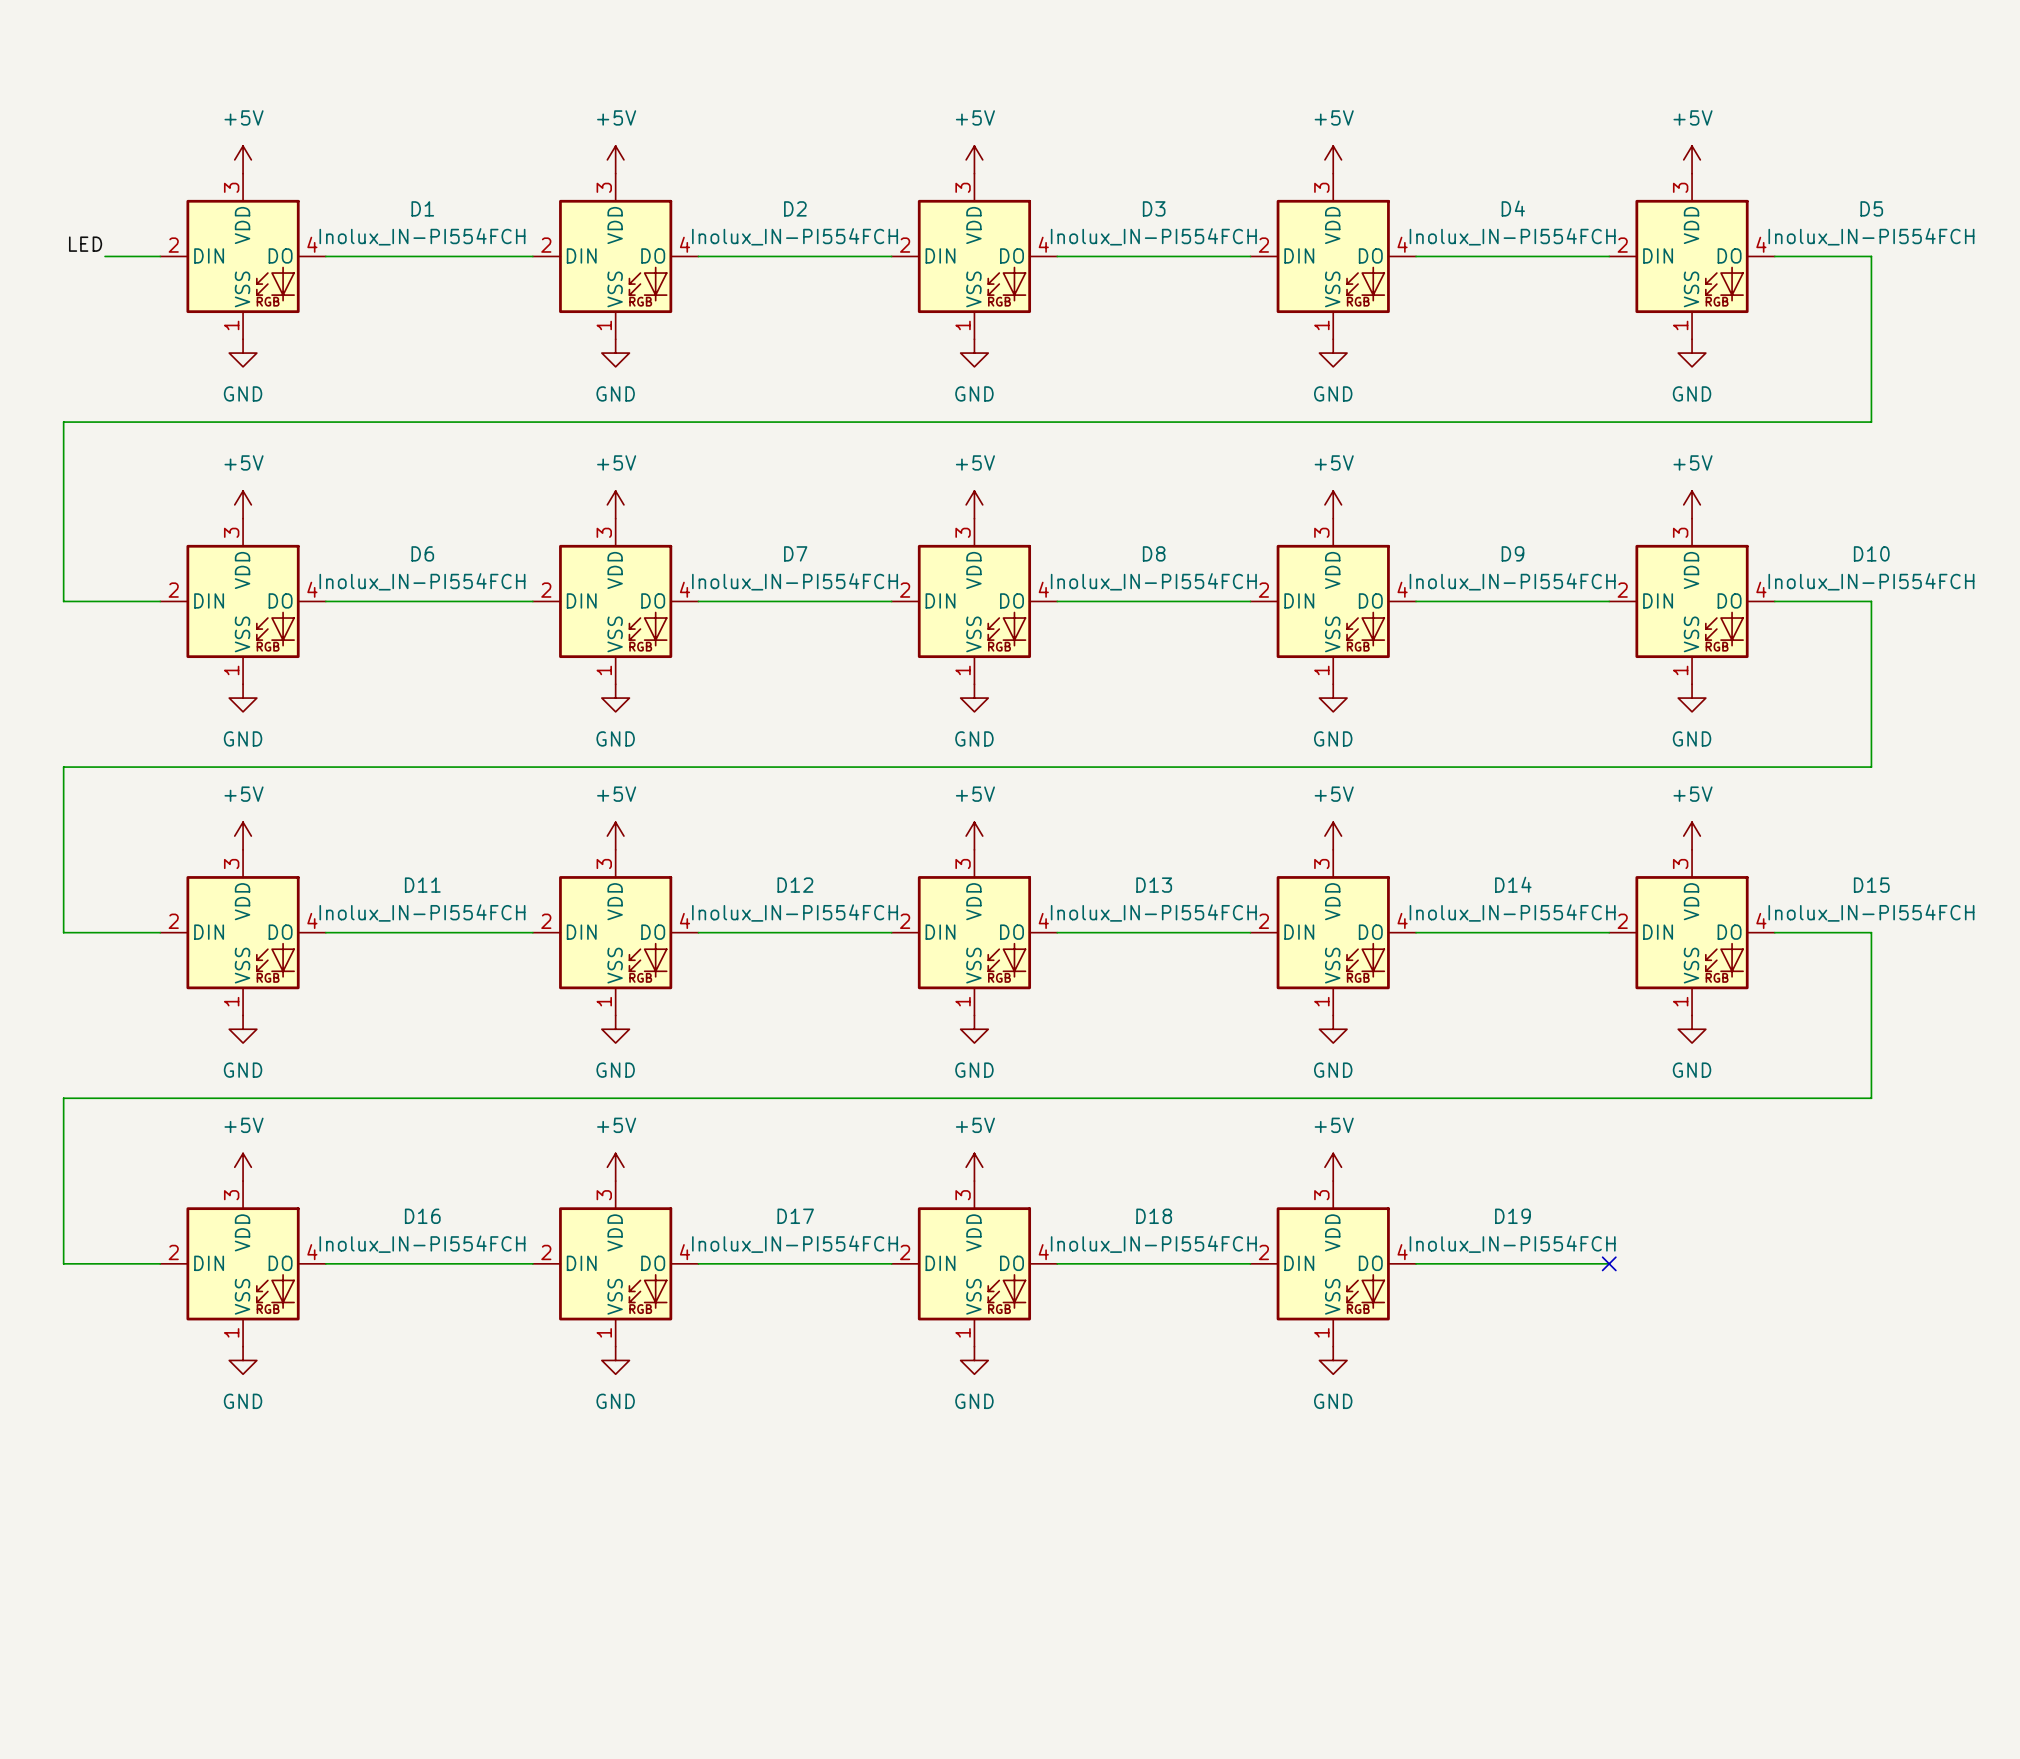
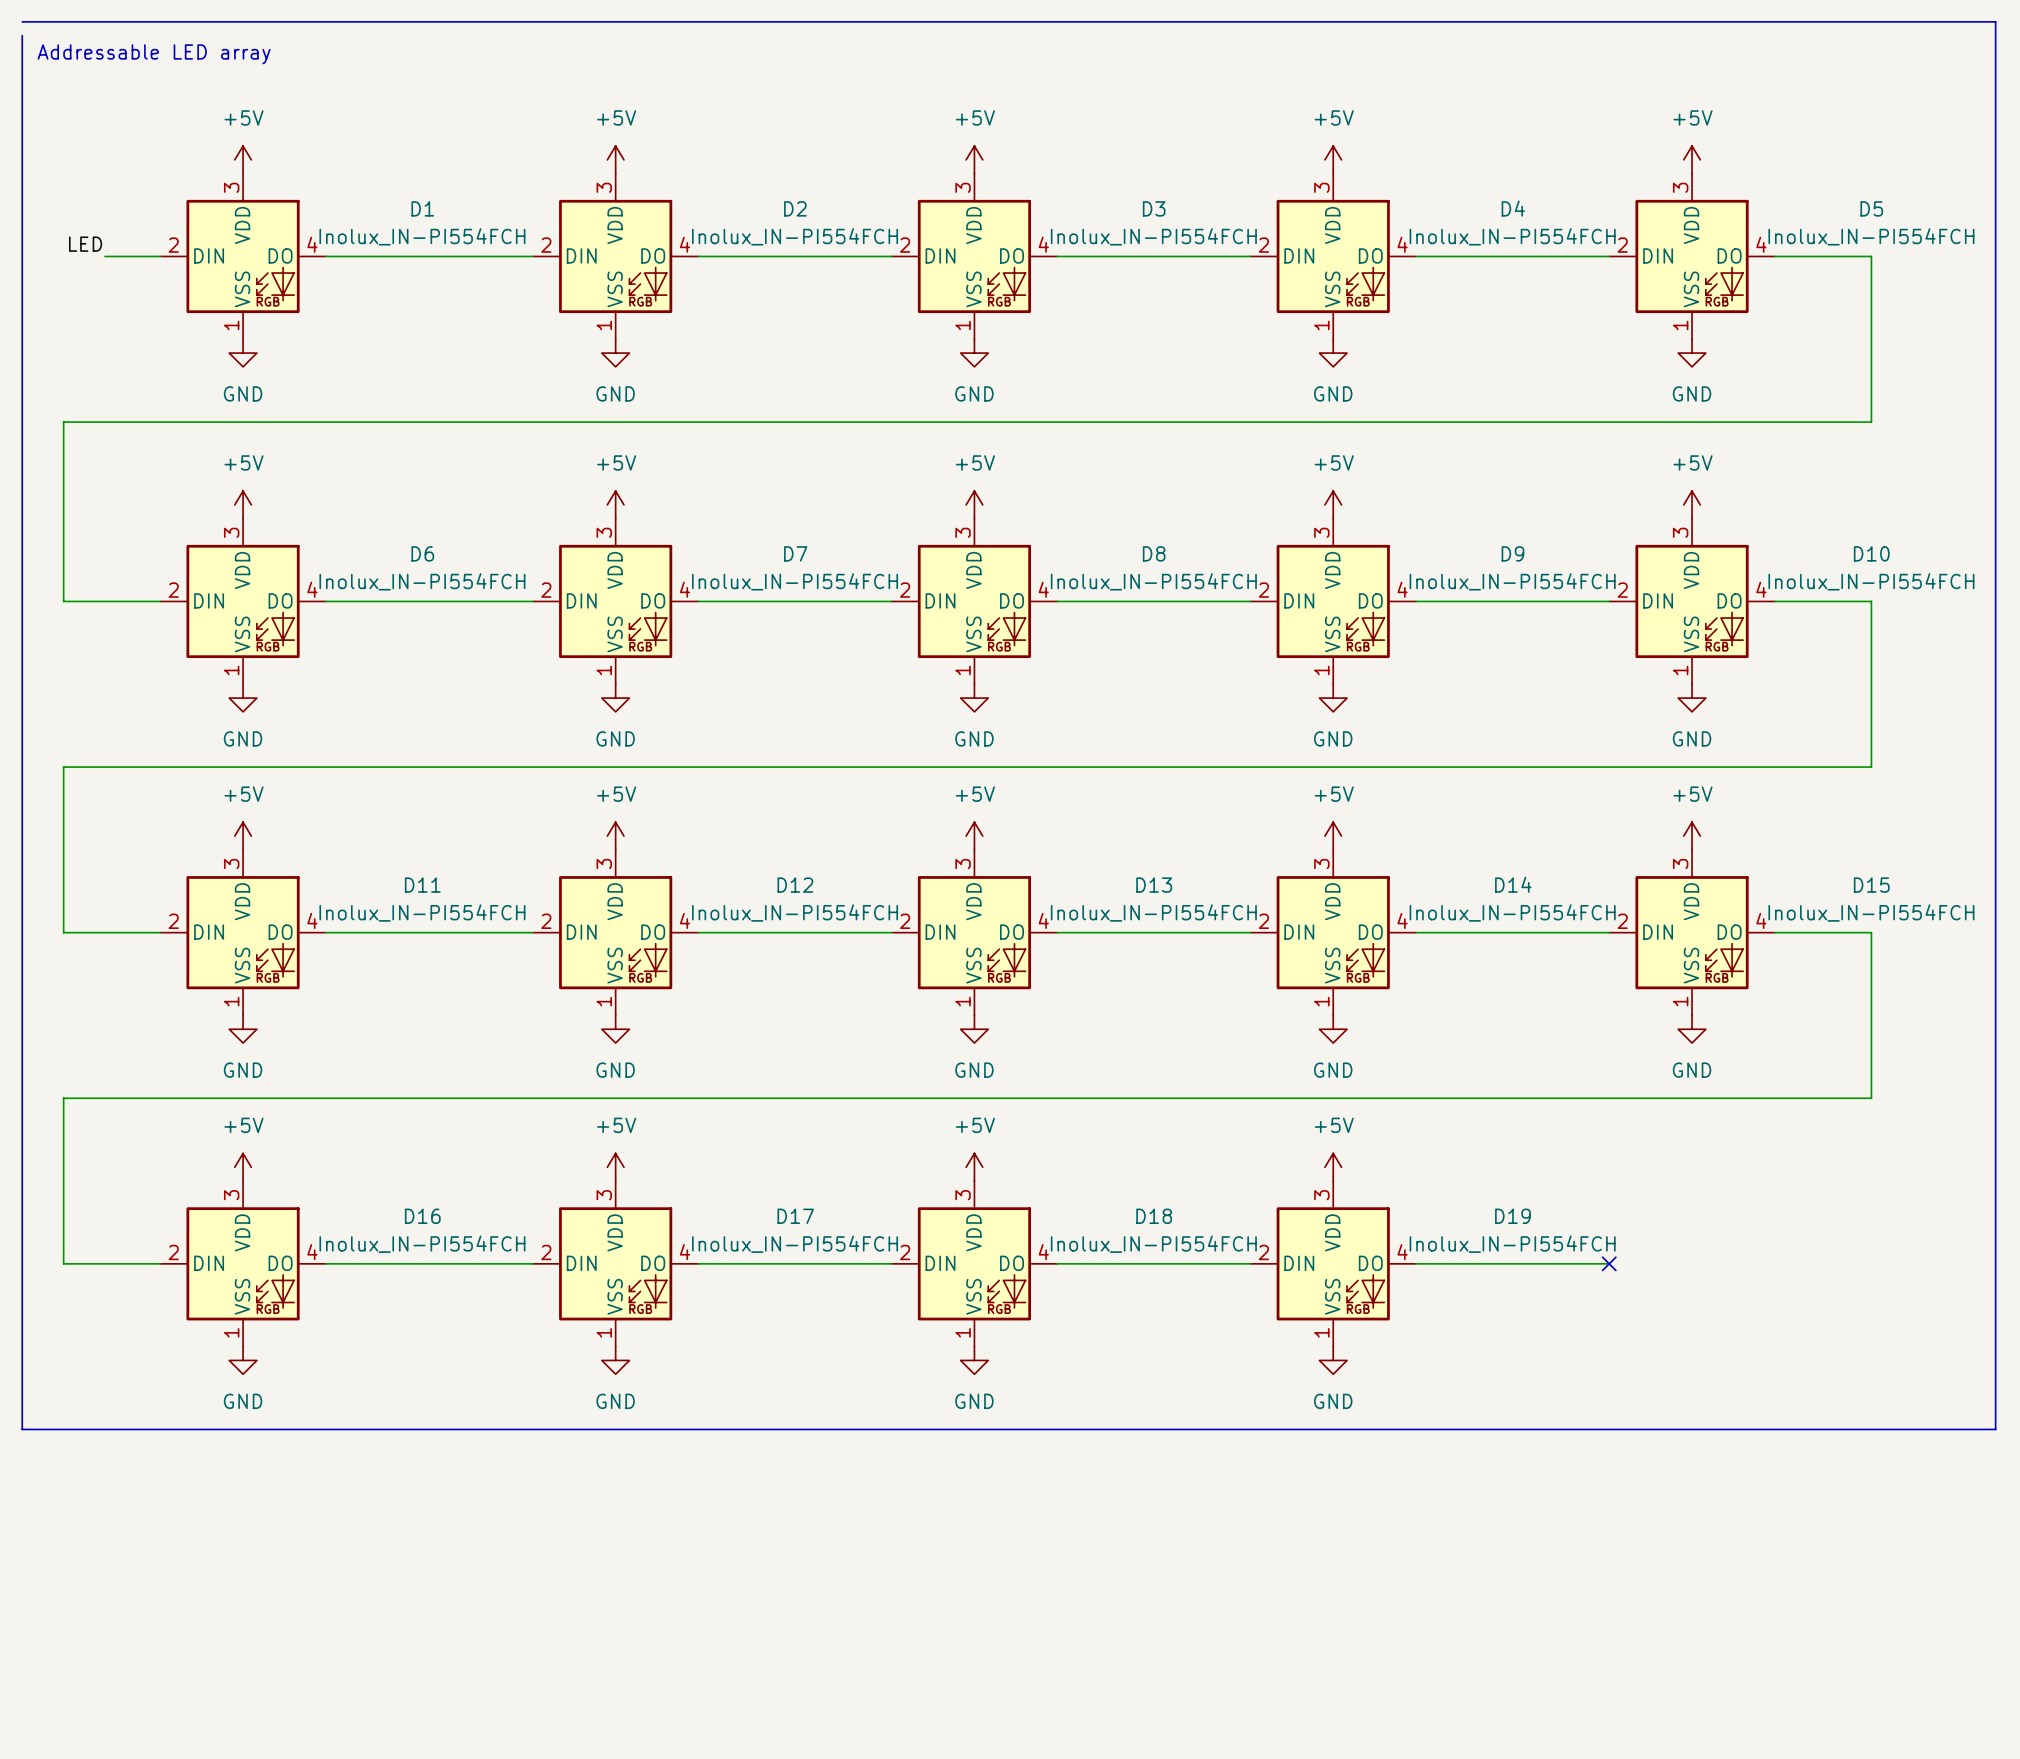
line: none -> (22, 21) (1995, 21) (1995, 1429) (22, 1429) (22, 35)
text: none -> Addressable LED array (154, 54)

